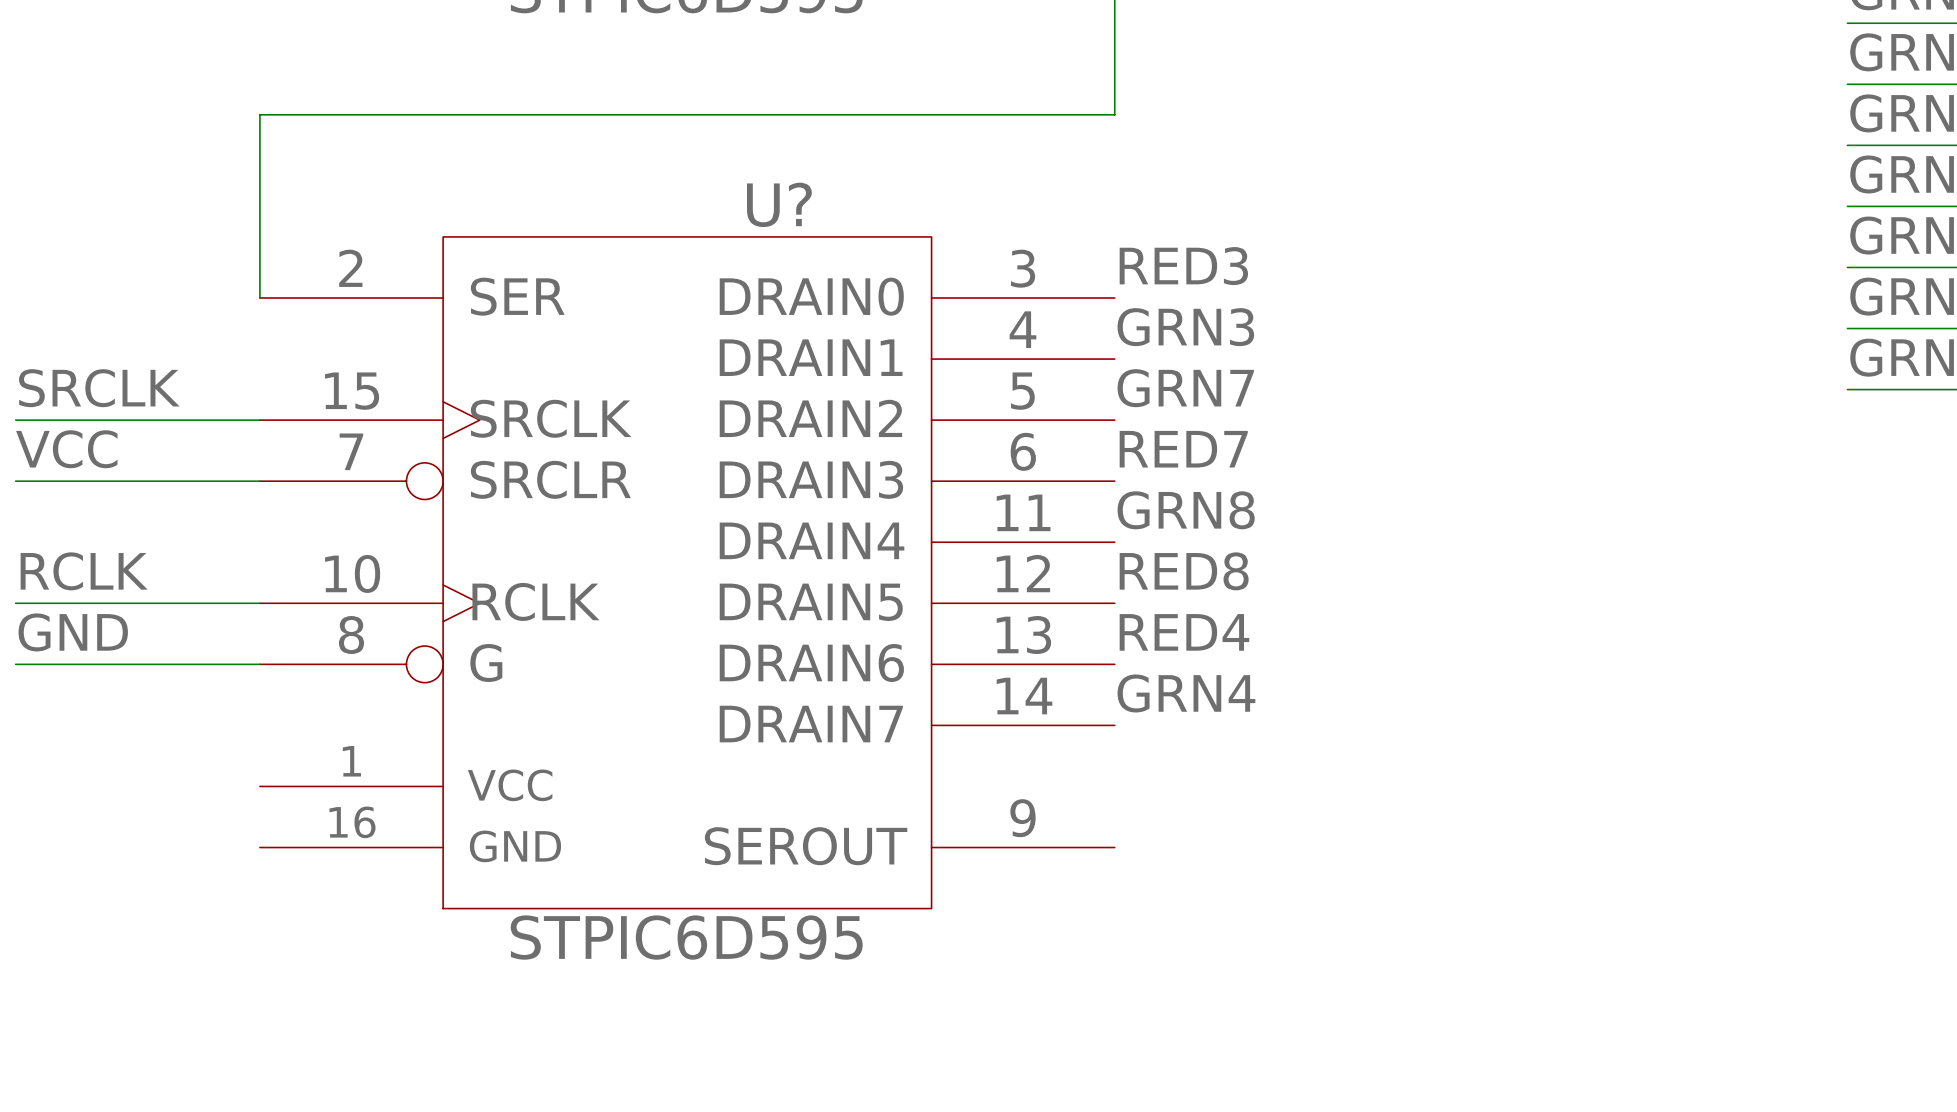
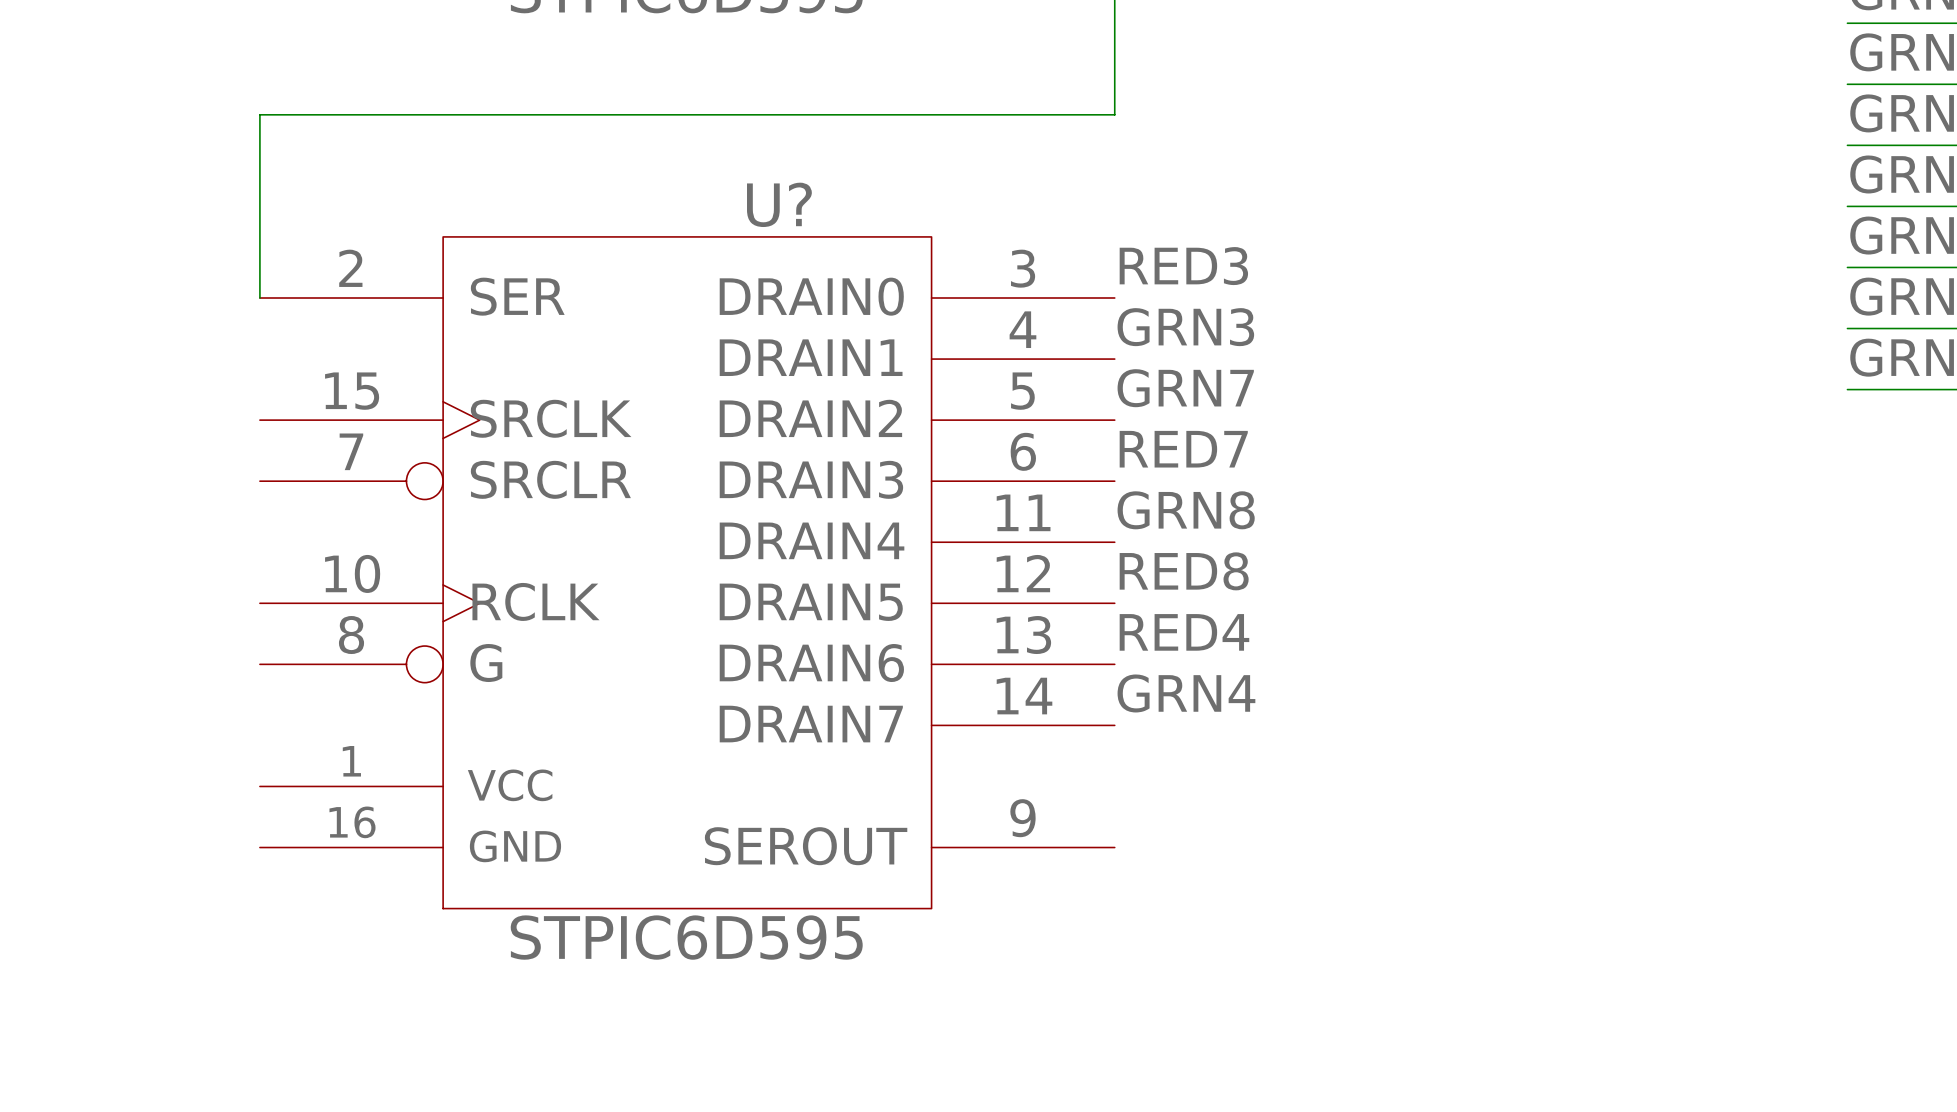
label: SRCLK (99, 388) -> none
wire: (15, 420) (259, 420) -> none
label: VCC (66, 449) -> none
wire: (15, 481) (259, 481) -> none
label: RCLK (84, 571) -> none
wire: (15, 603) (259, 603) -> none
label: GND (73, 632) -> none
wire: (15, 664) (259, 664) -> none

